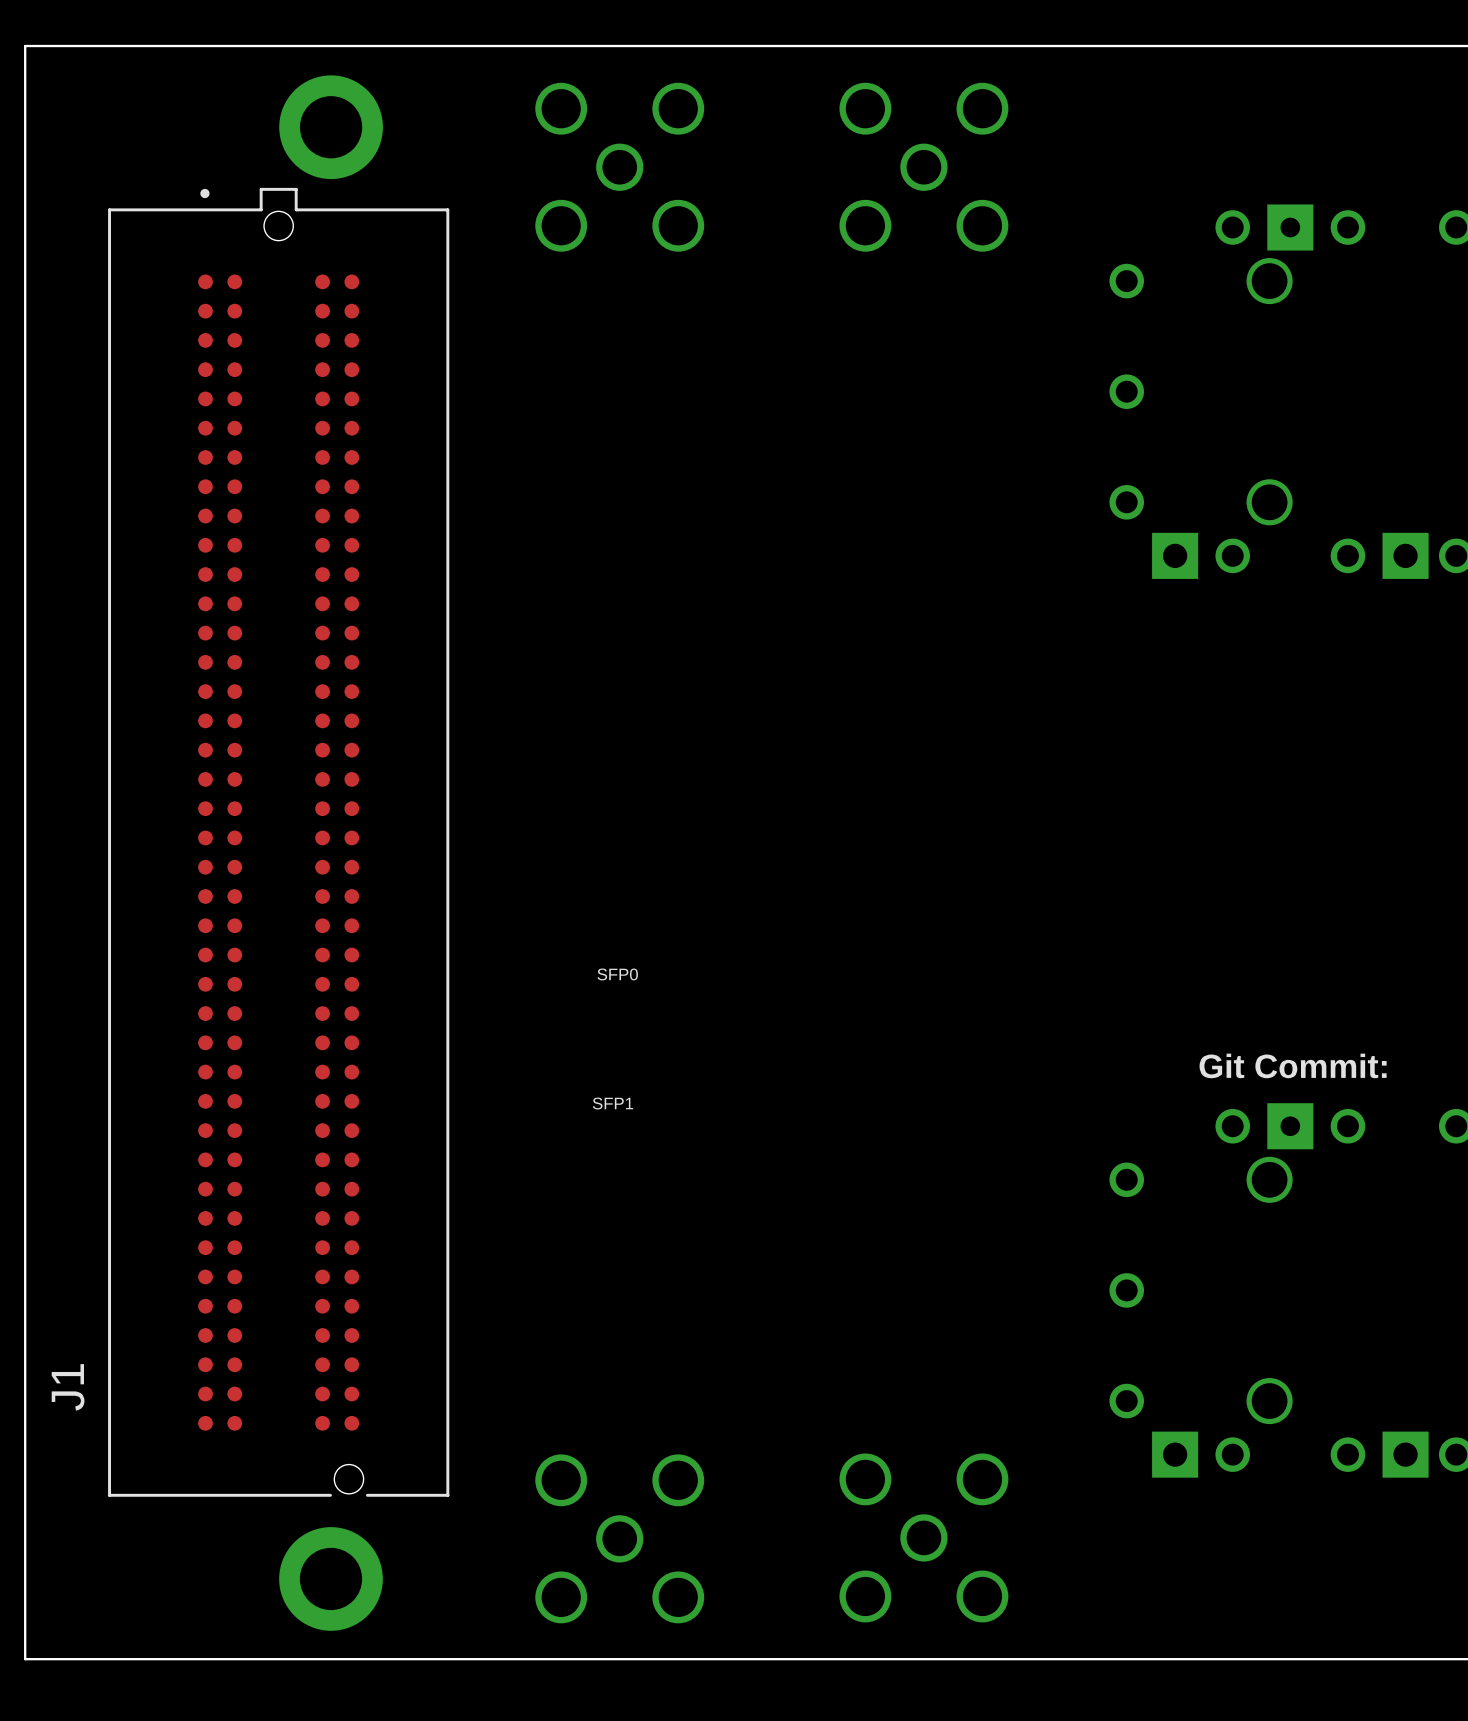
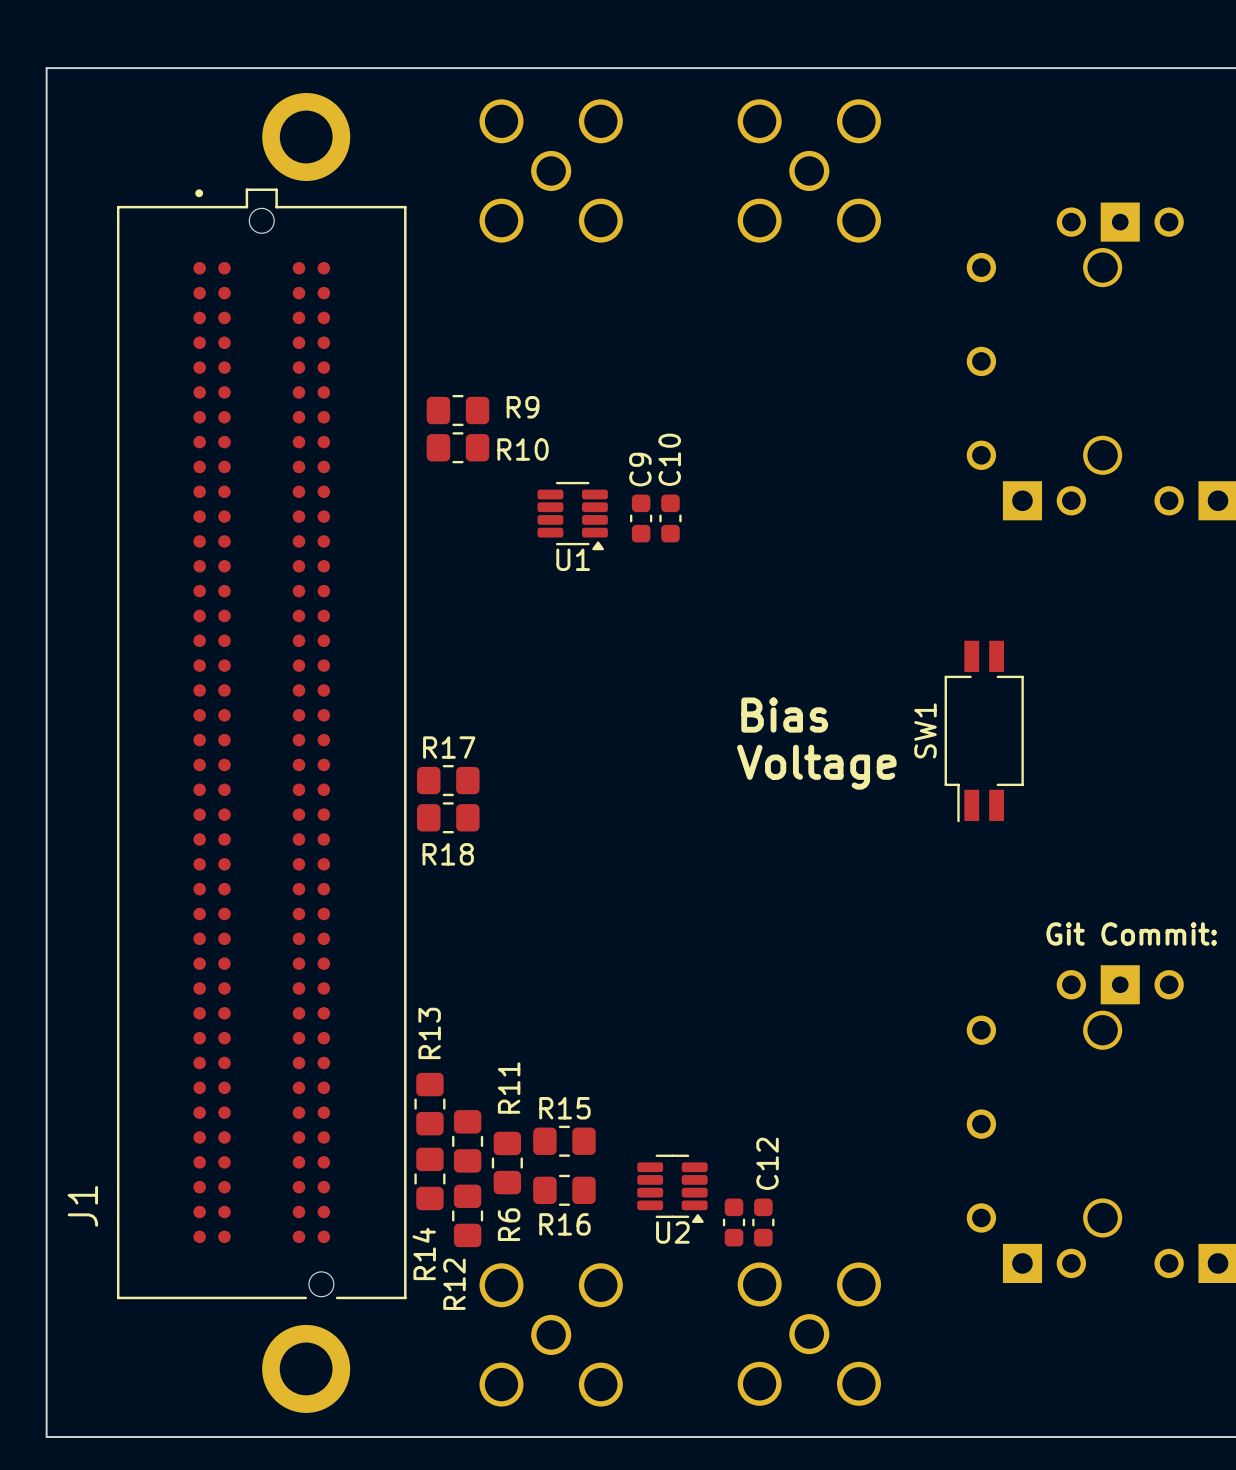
R9: none -> (457, 410)
R10: none -> (457, 447)
U1: none -> (572, 516)
C9: none -> (641, 518)
C10: none -> (670, 518)
text: none -> Bias (784, 715)
SW1: none -> (984, 731)
text: none -> Voltage (816, 767)
R17: none -> (448, 780)
R18: none -> (448, 817)
text: SFP0 (617, 974) -> none
text: SFP1 (613, 1103) -> none
R13: none -> (429, 1104)
R11: none -> (467, 1141)
R15: none -> (564, 1141)
R6: none -> (507, 1163)
R14: none -> (429, 1178)
U2: none -> (672, 1188)
R16: none -> (564, 1190)
R12: none -> (467, 1215)
part: none -> (734, 1222)
C12: none -> (763, 1222)

